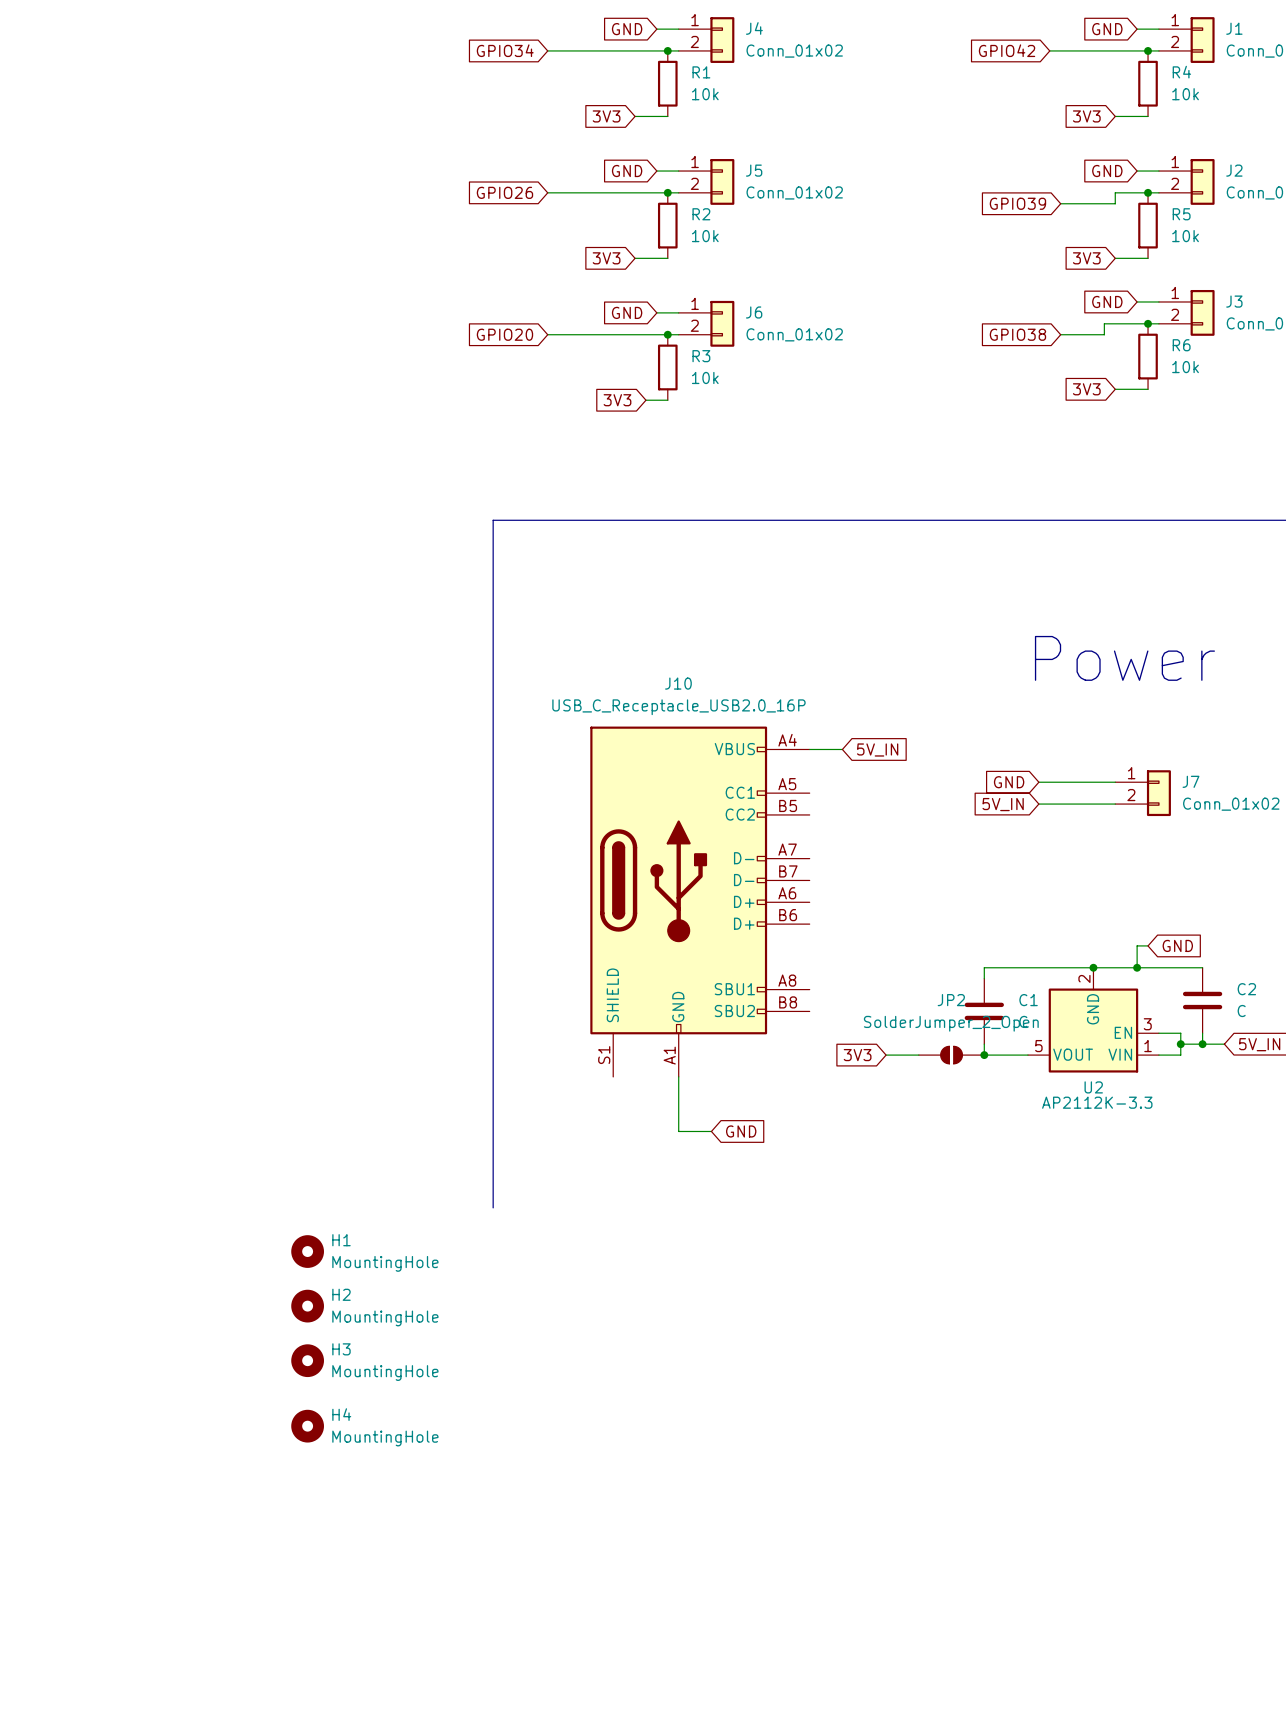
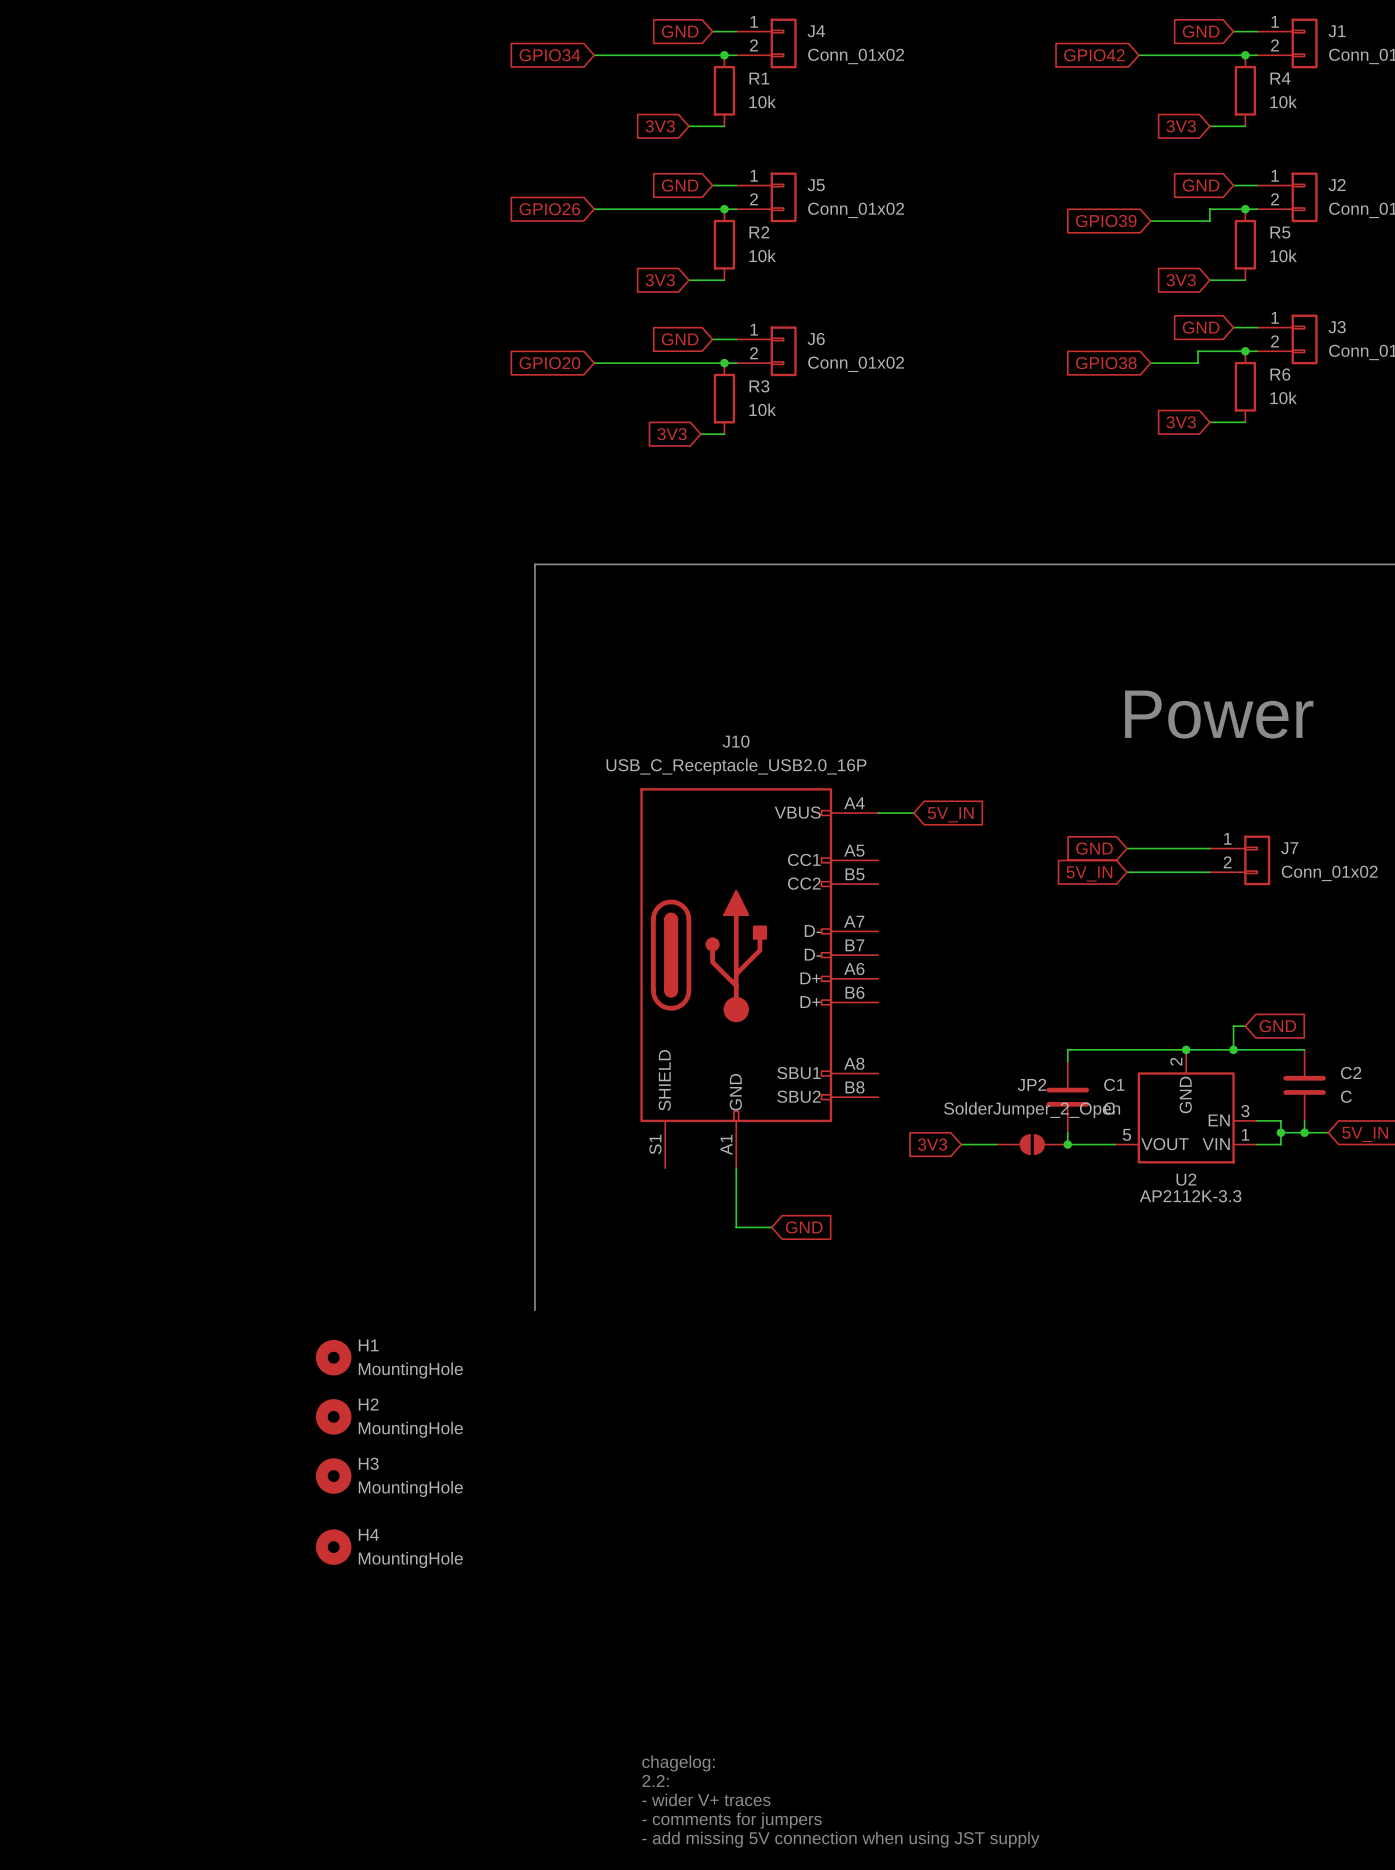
text: none -> chagelog: (678, 1763)
text: none -> 2.2: (655, 1780)
text: none -> - wider V+ traces (706, 1799)
text: none -> - comments for jumpers (731, 1820)
text: none -> - add missing 5V connection when using JST supply (840, 1839)

